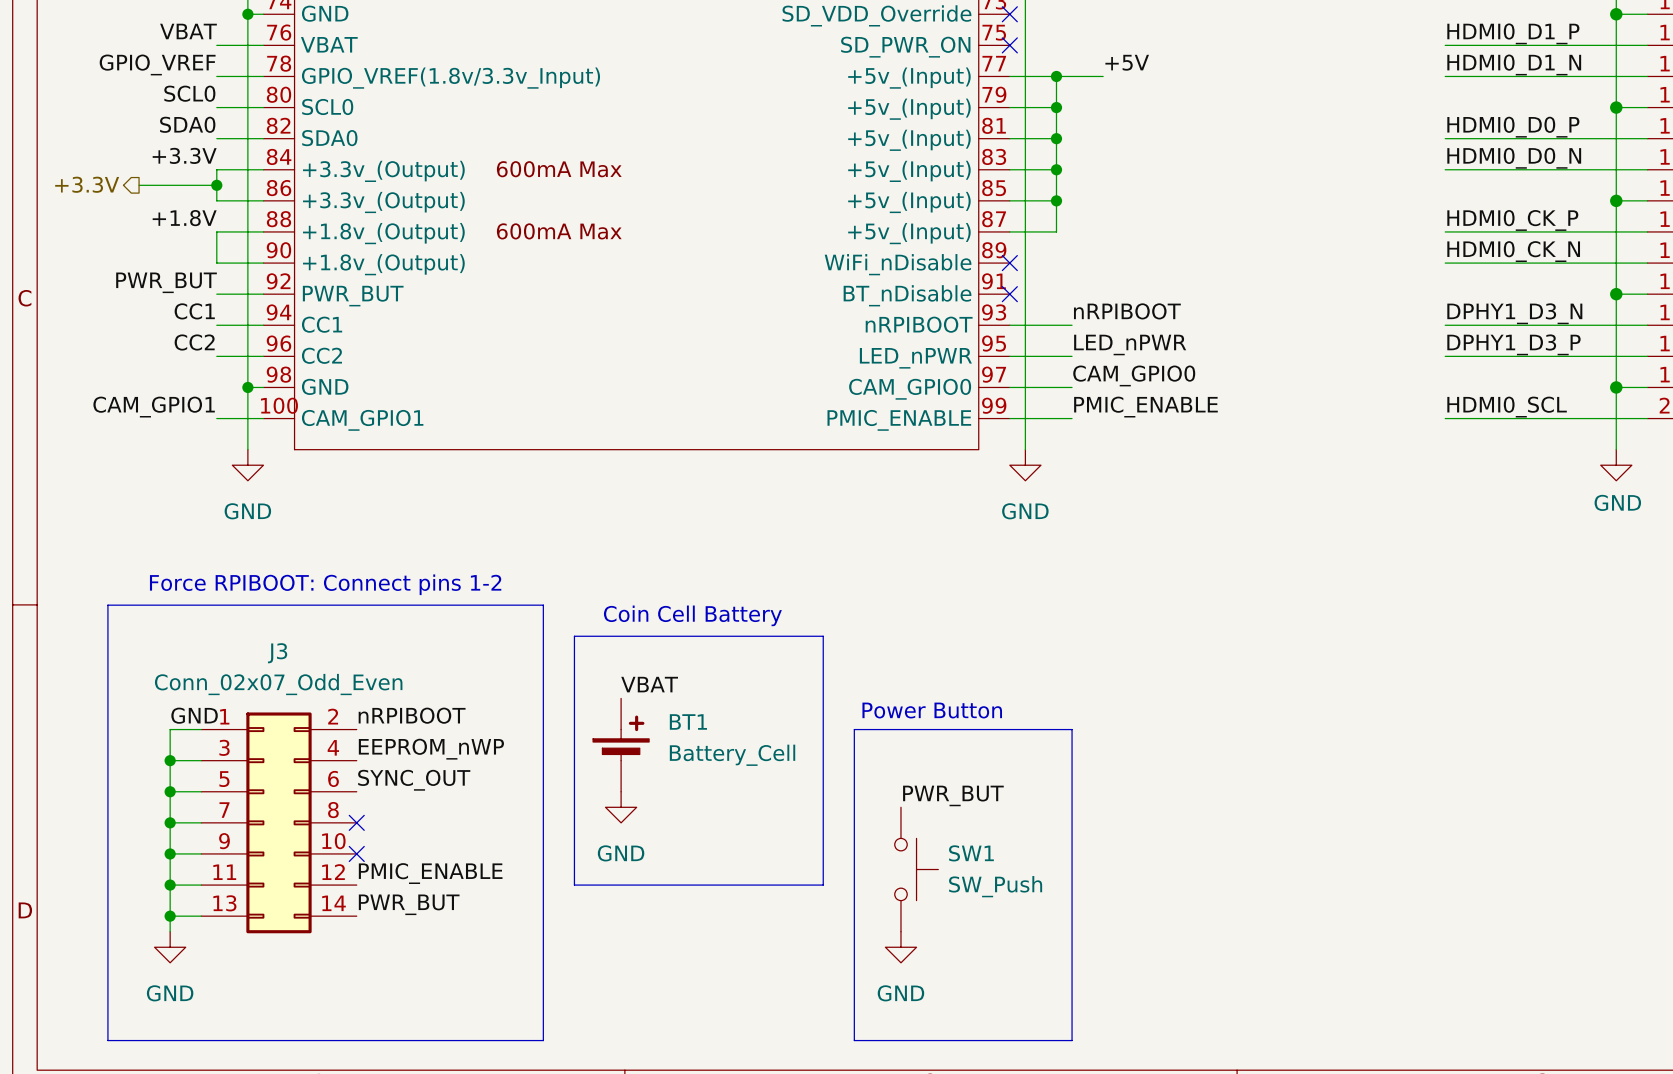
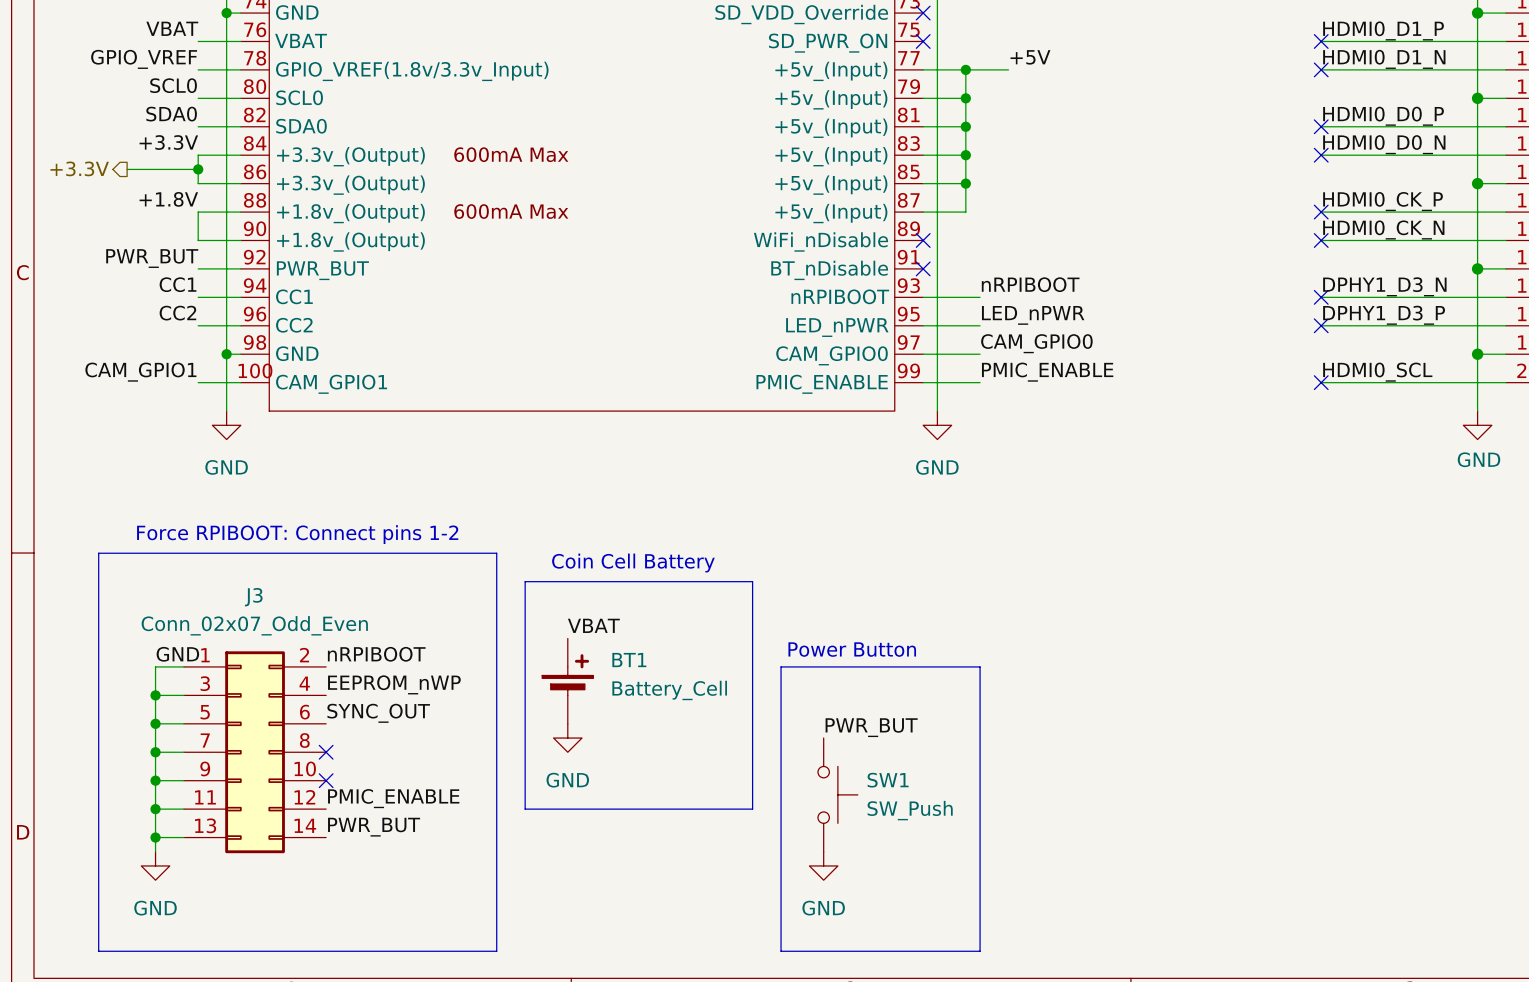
no-connect mark: none -> (1321, 41)
no-connect mark: none -> (1321, 69)
no-connect mark: none -> (1321, 126)
no-connect mark: none -> (1321, 155)
no-connect mark: none -> (1321, 212)
no-connect mark: none -> (1321, 240)
no-connect mark: none -> (1321, 297)
no-connect mark: none -> (1321, 325)
no-connect mark: none -> (1321, 382)

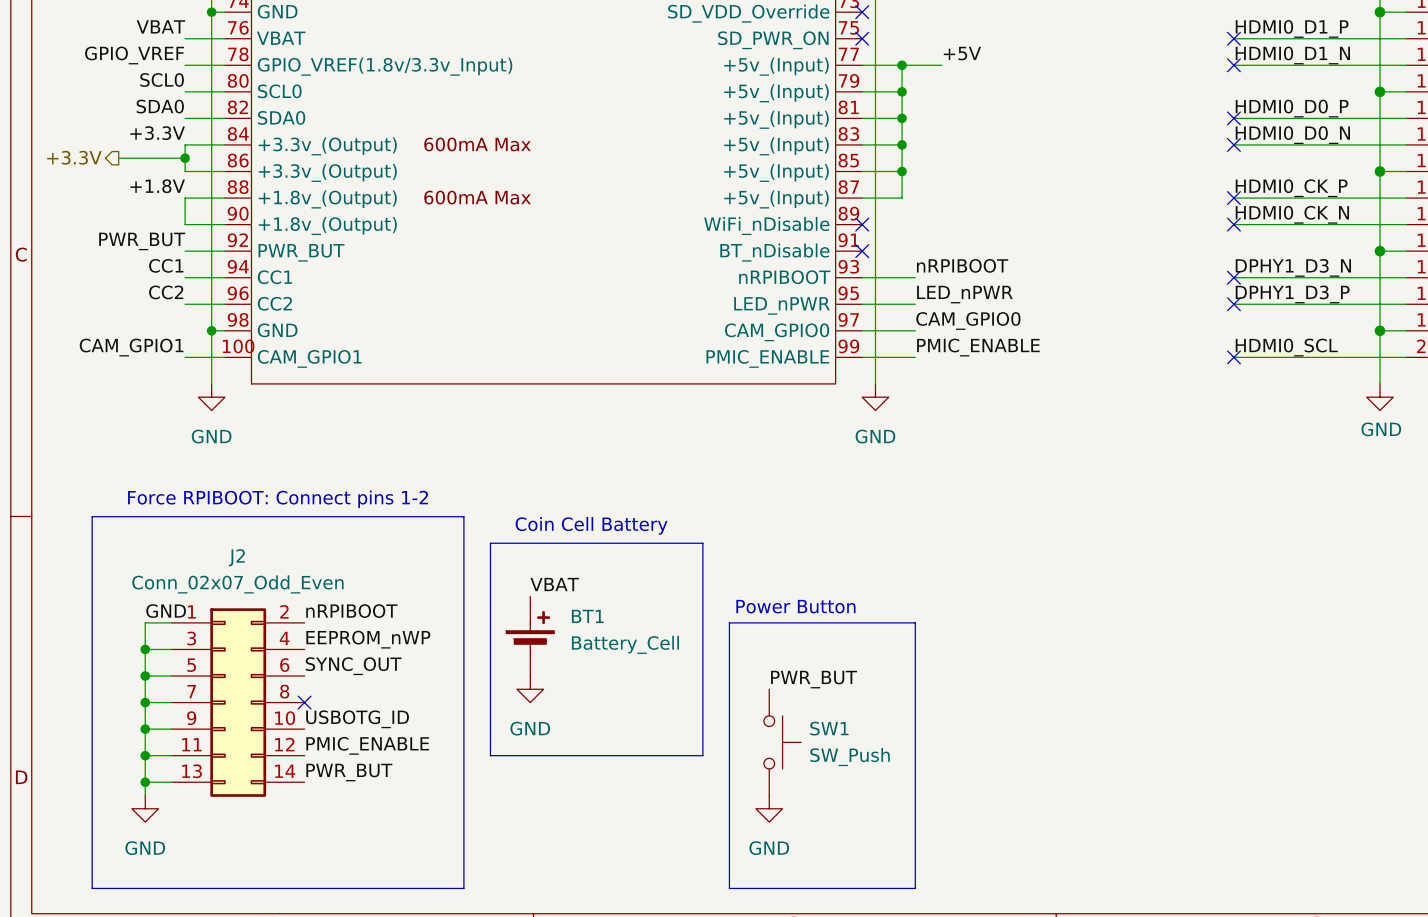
J3 name: J3 (253, 597) -> J2 (236, 557)
label: none -> USBOTG_ID (357, 719)
no-connect mark: (326, 780) -> none

